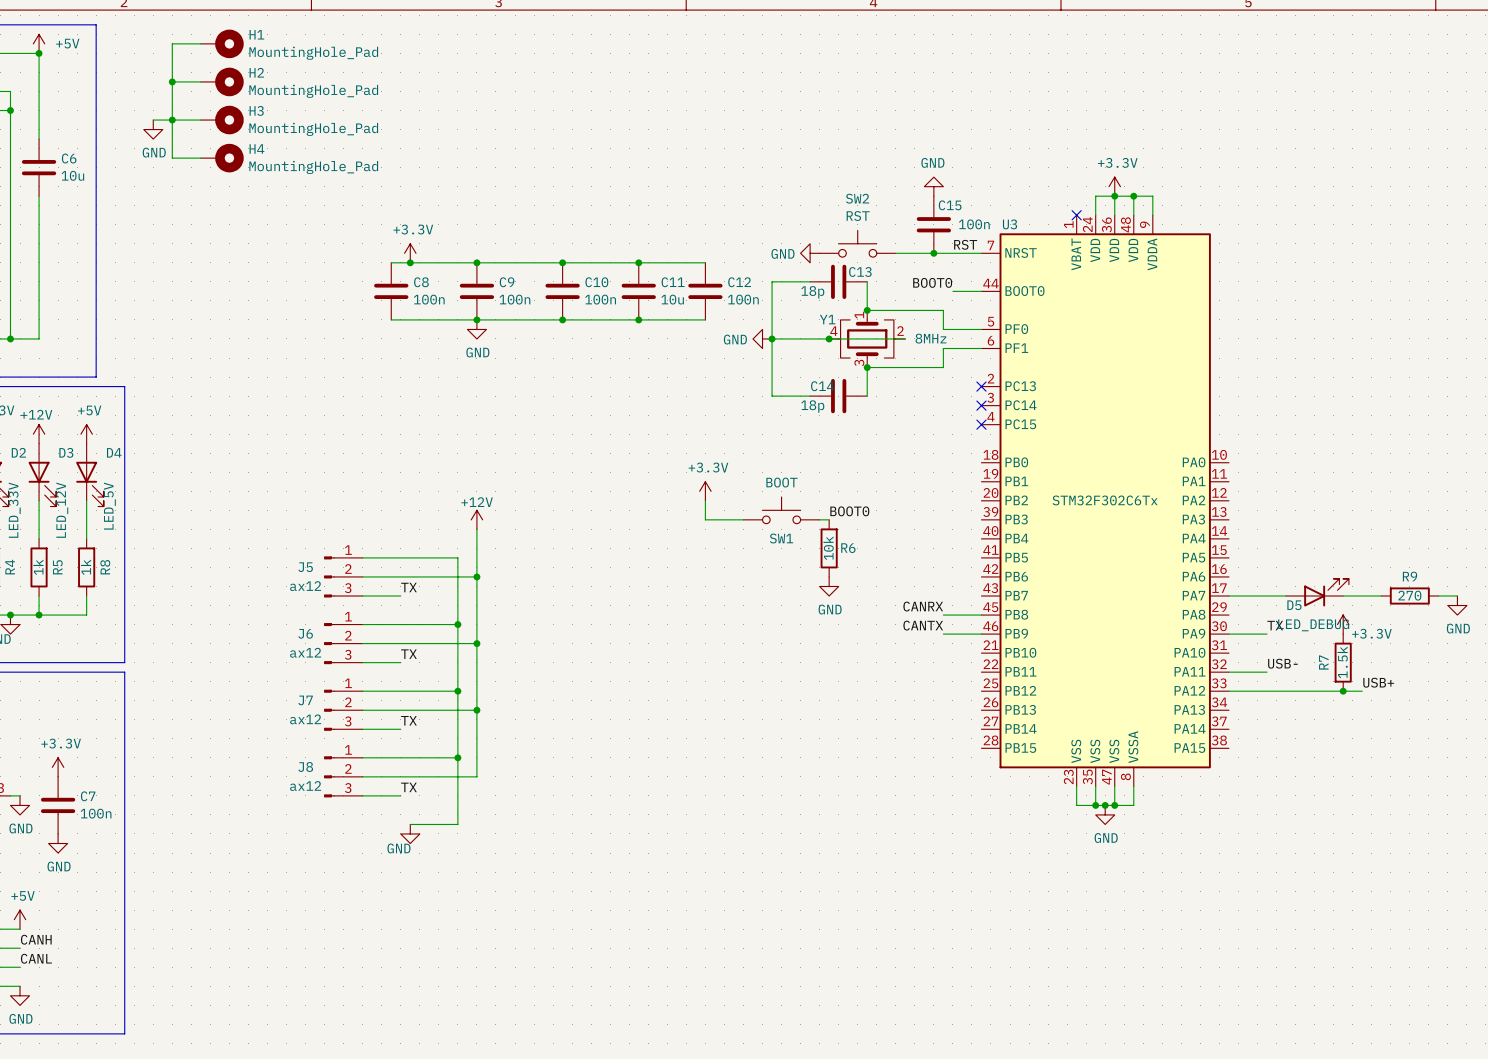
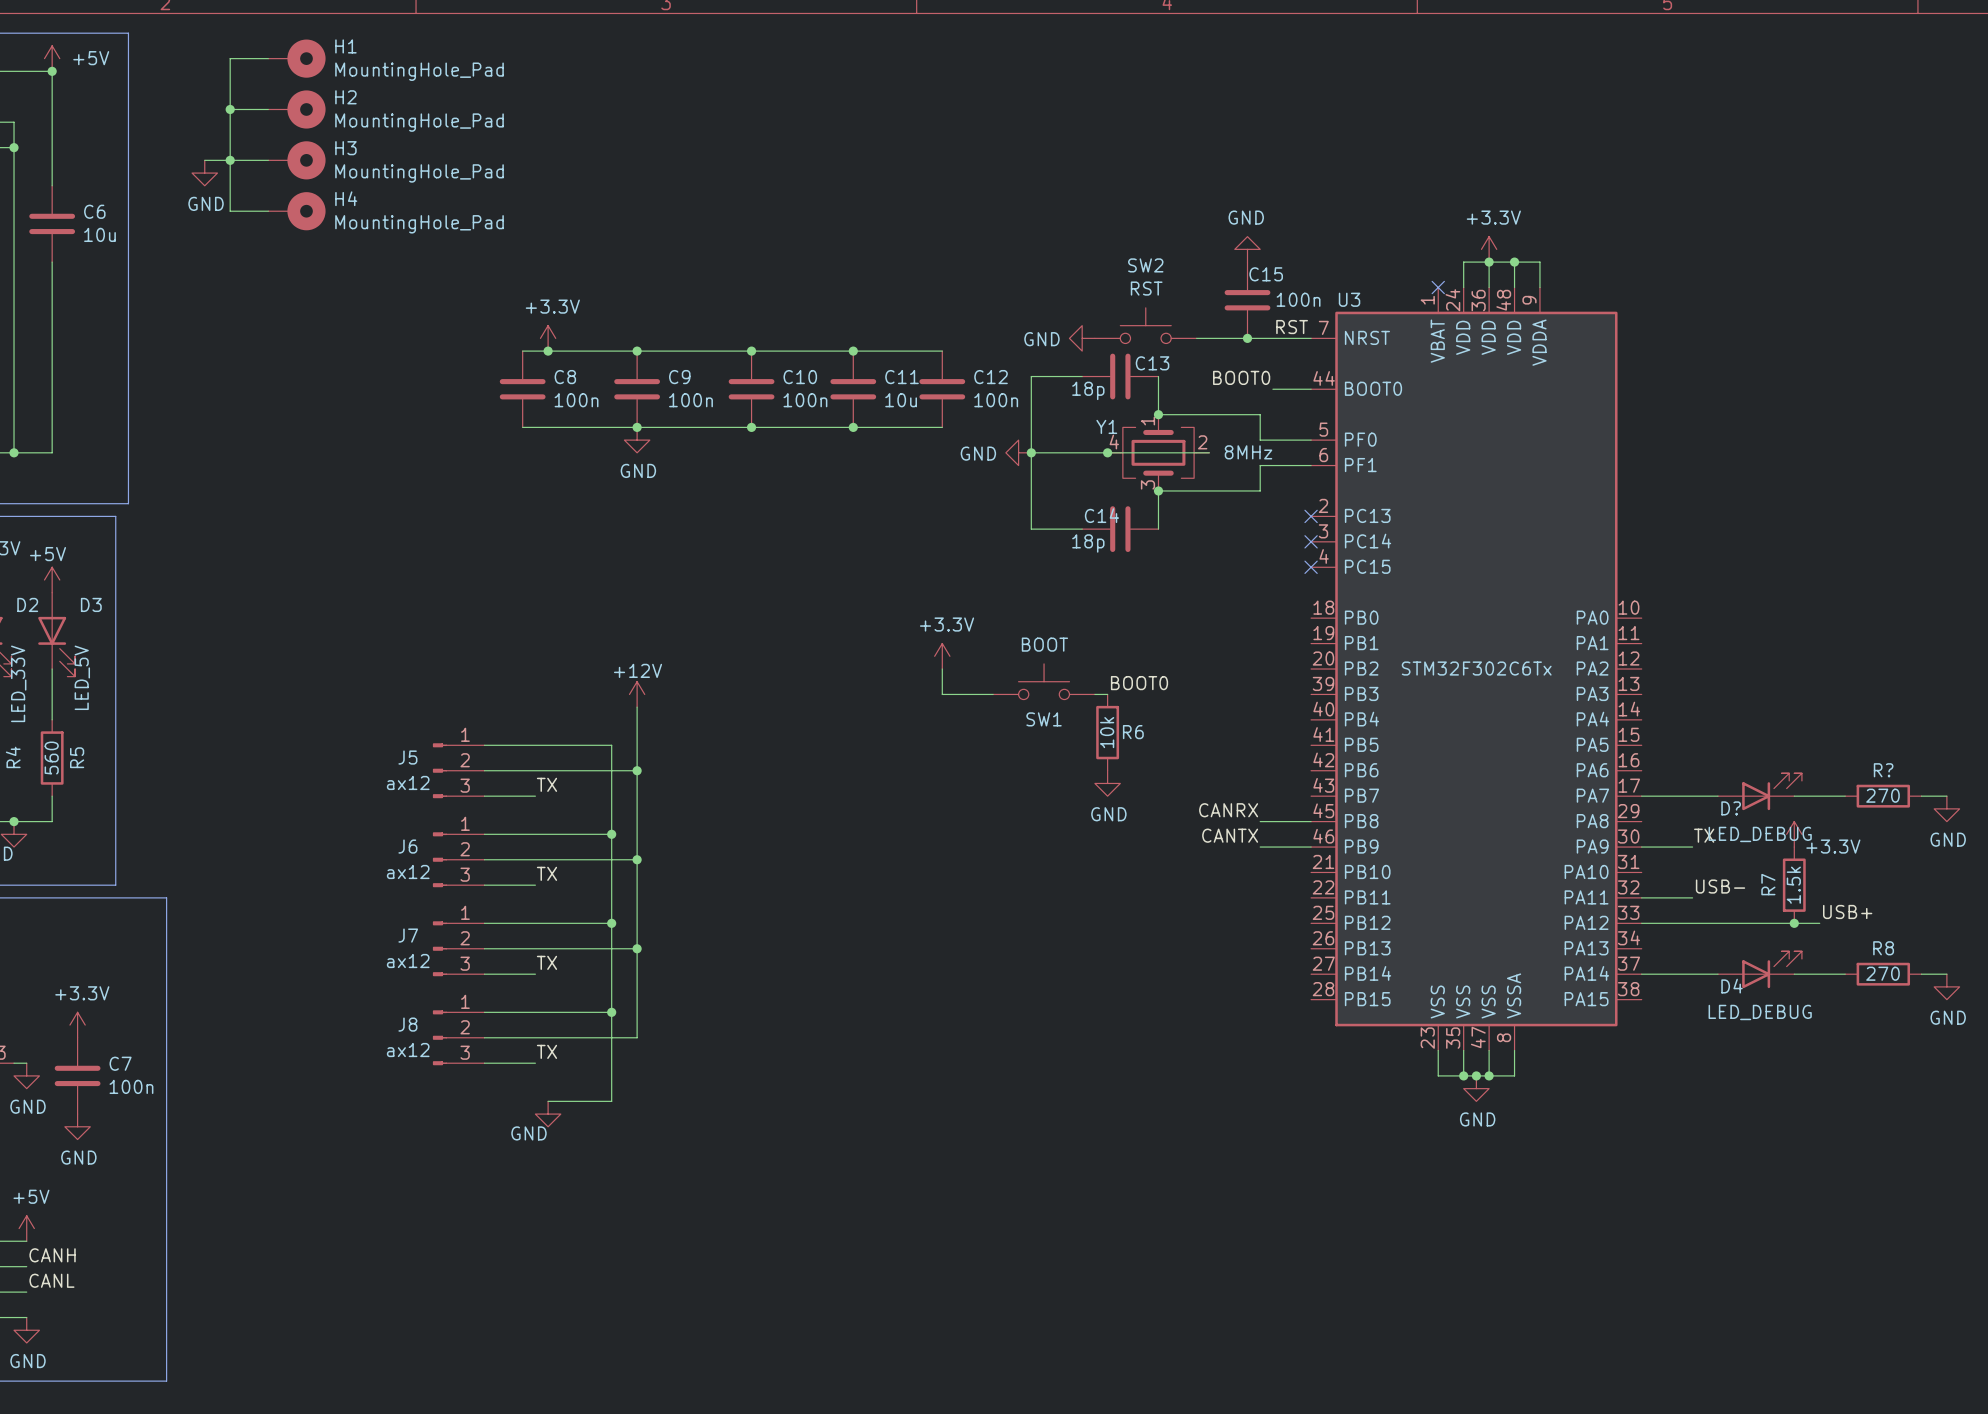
line: (86, 386) (124, 386) (124, 662) (86, 662) -> (115, 516) (115, 885)
power symbol: +12V (39, 434) -> +5V (52, 579)
power symbol: +5V (86, 434) -> none
D4 name position: D4 (114, 452) -> D4 (1732, 986)
D4 position: (89, 475) -> (1759, 969)
D4 rotation: 0° (89, 484) -> 90° counterclockwise (1772, 969)
D4 value: LED_5V (109, 506) -> LED_DEBUG (1760, 1012)
D3 value: LED_12V (62, 510) -> LED_5V (82, 677)
R5 value: 1k (38, 567) -> 560 (51, 758)
R8 rotation: 0° (86, 567) -> 90° clockwise (1883, 974)
R8 position: (86, 567) -> (1883, 974)
R8 value: 1k (86, 567) -> 270 (1883, 973)
R8 name position: R8 (105, 567) -> R8 (1883, 948)
R9 name: R9 (1410, 576) -> R? (1883, 770)
wire: (86, 596) (86, 615) (39, 615) -> none
D5 name: D5 (1294, 605) -> D? (1731, 808)
junction: (39, 615) -> none
wire: none -> (1641, 974) (1718, 974)
wire: none -> (1794, 974) (1845, 974)
wire: none -> (1921, 974) (1946, 974)
power symbol: none -> GND (1946, 986)

